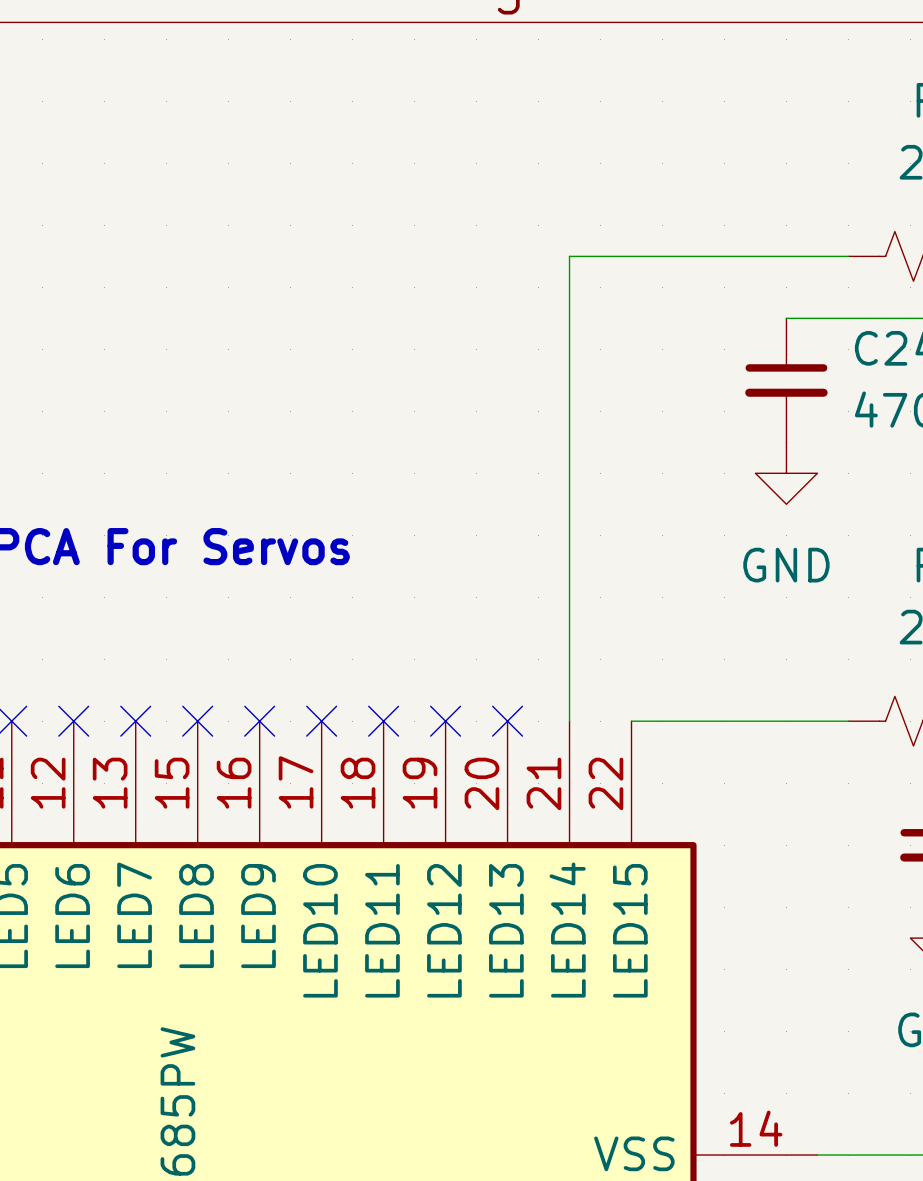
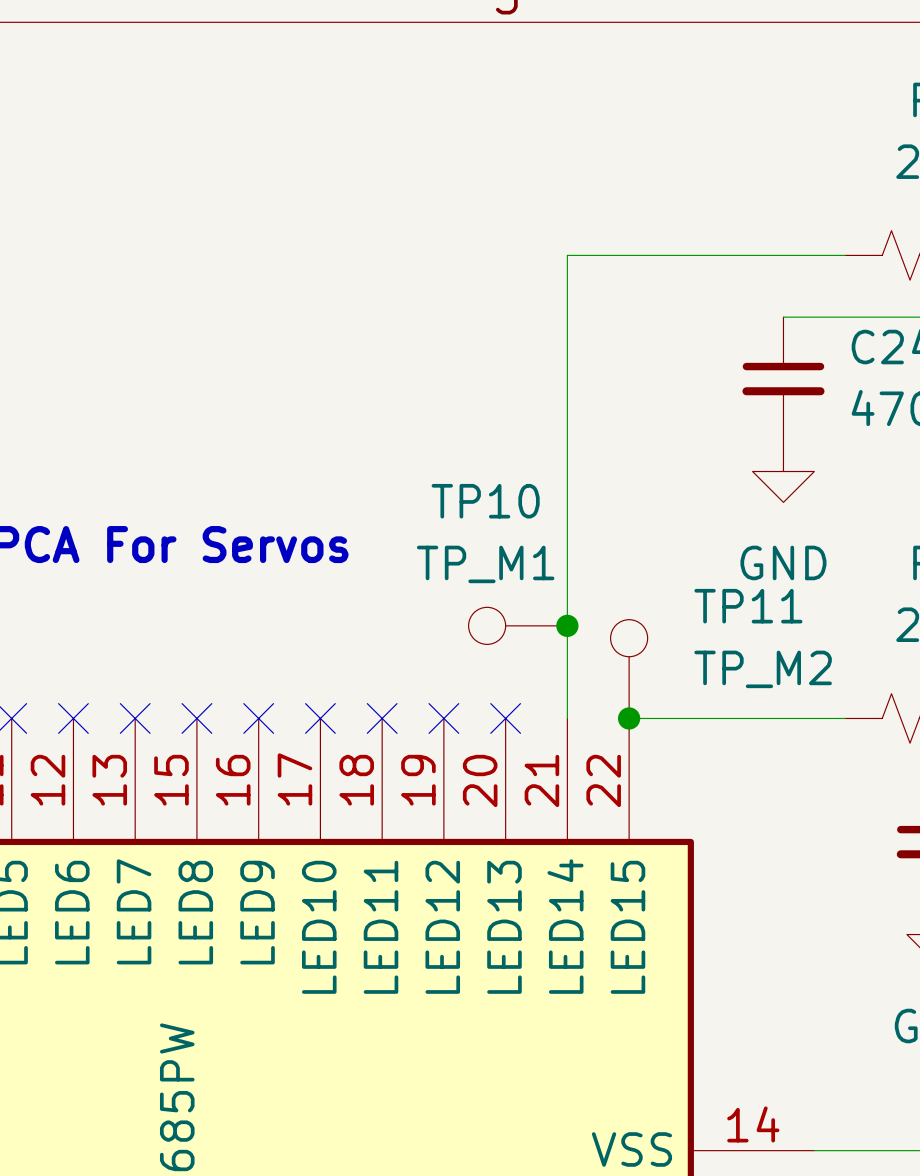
TP10: none -> TP_M1 (517, 625)
junction: none -> (567, 625)
TP11: none -> TP_M2 (629, 669)
junction: none -> (629, 718)

